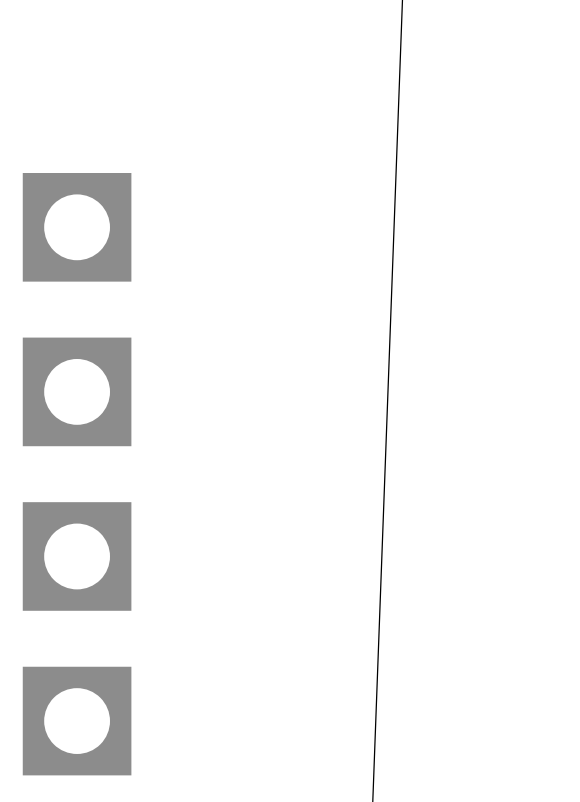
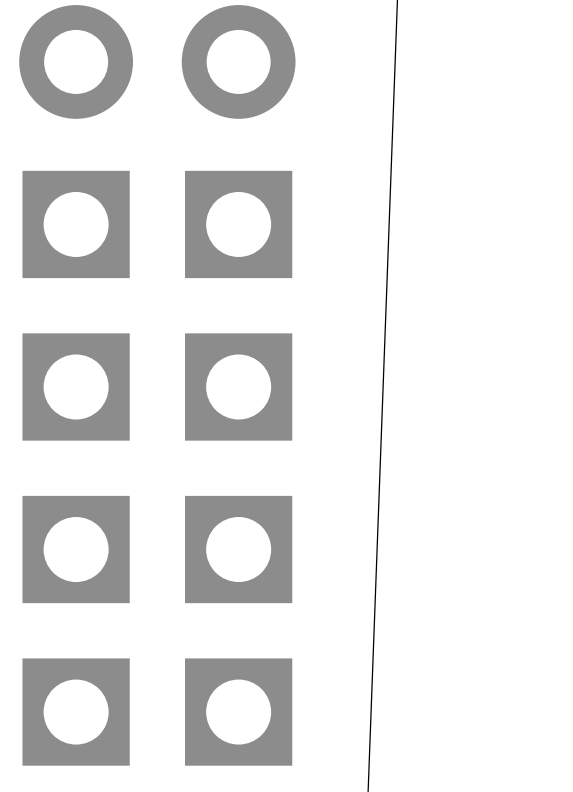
via: none -> (76, 61)
via: none -> (238, 61)
part: none -> (238, 224)
part: none -> (238, 387)
part: none -> (238, 549)
part: none -> (238, 712)

